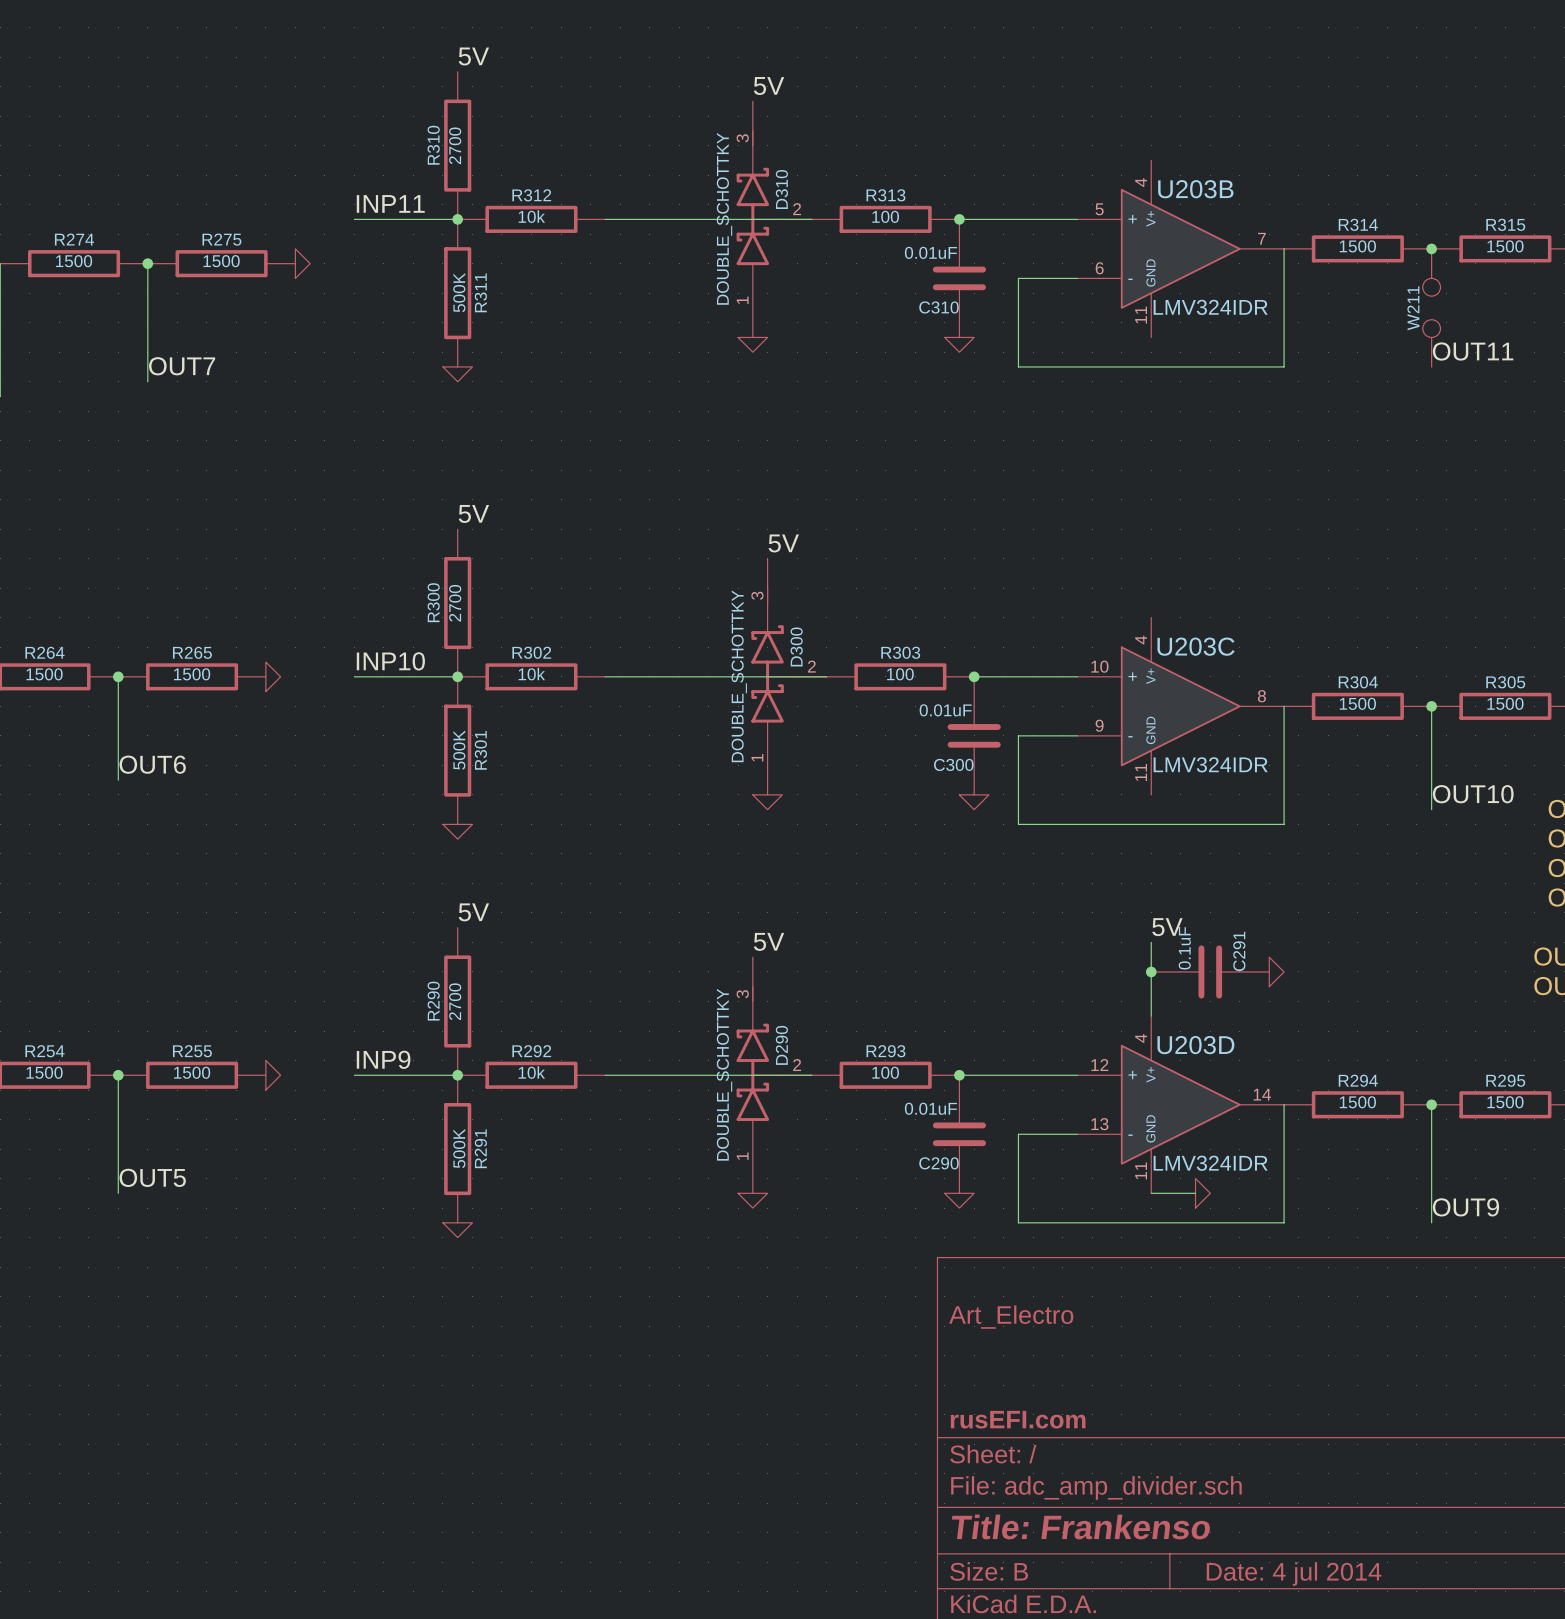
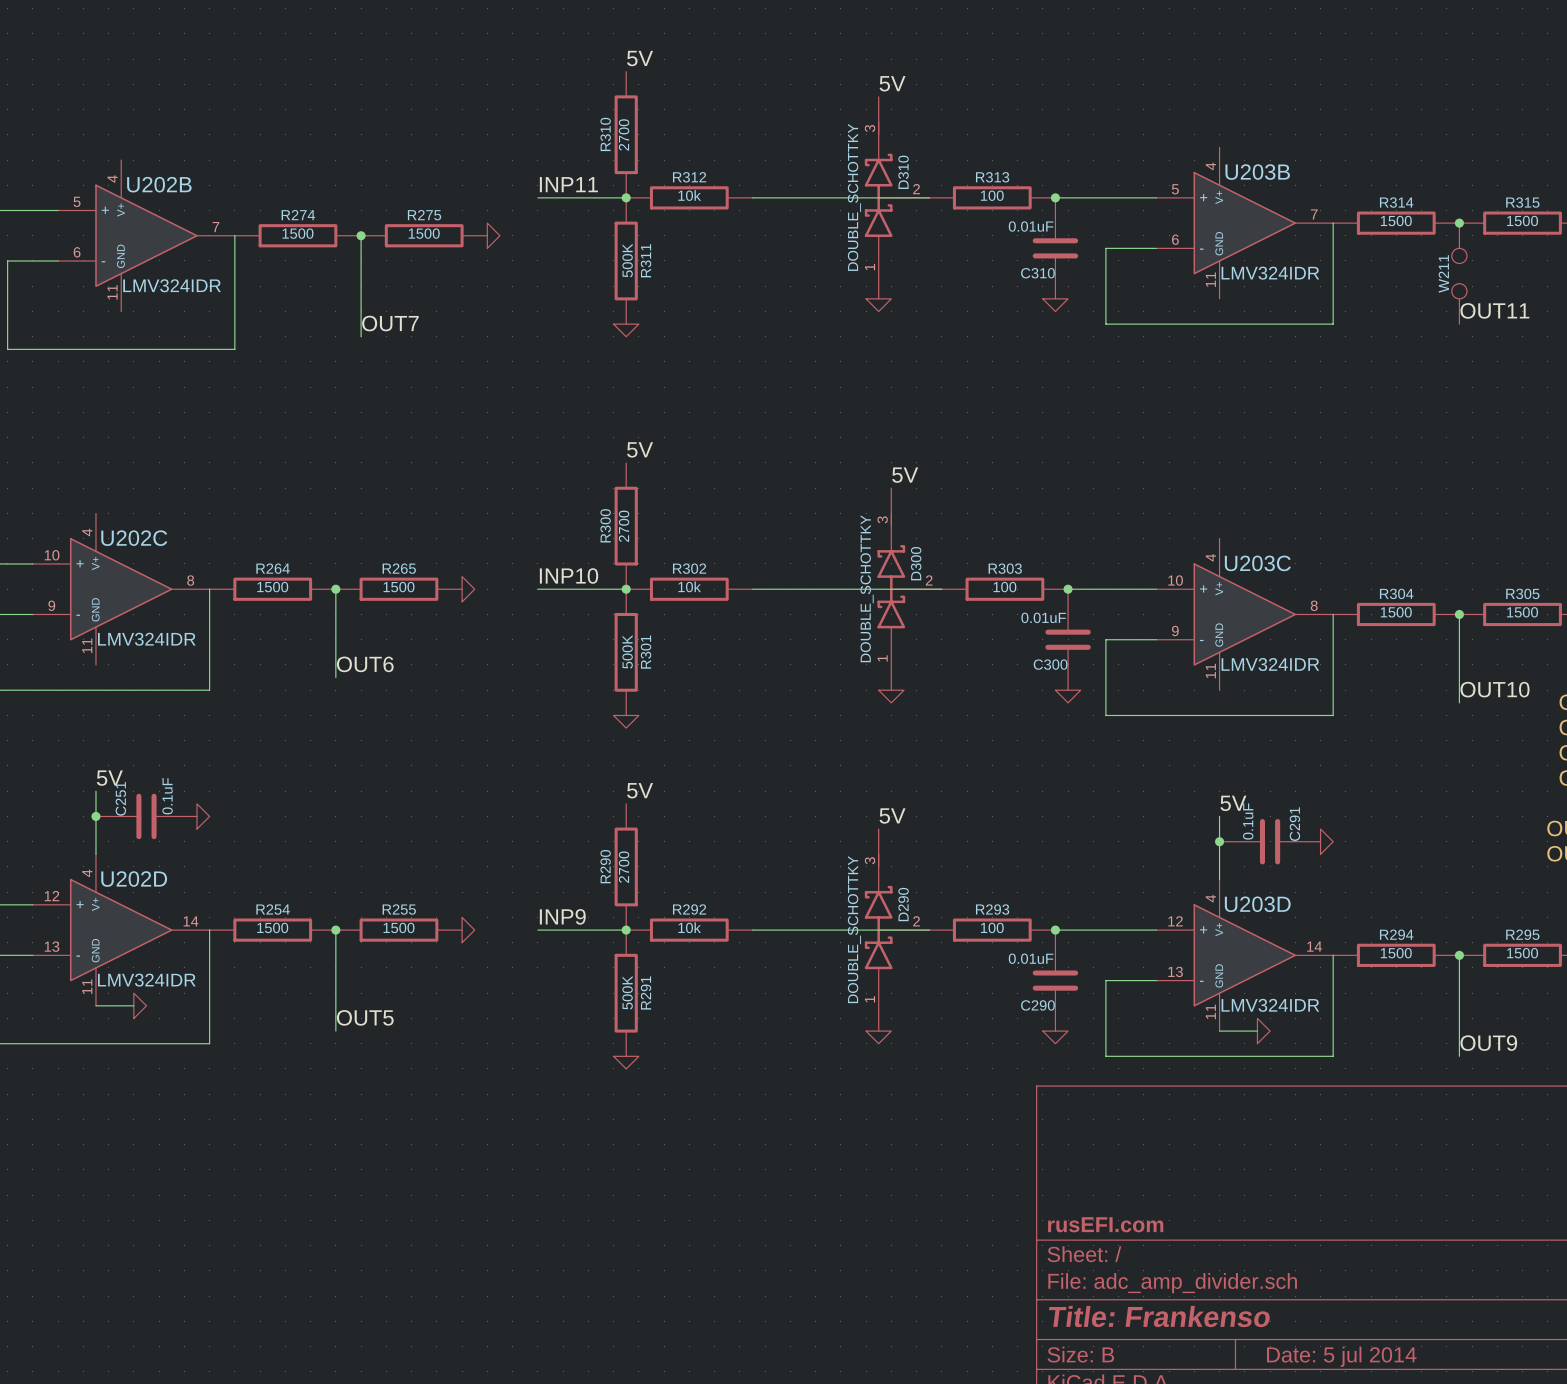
title block: Art_Electro (1011, 1317) -> none
title block: Date: 4 jul 2014 (1294, 1573) -> Date: 5 jul 2014 (1341, 1356)

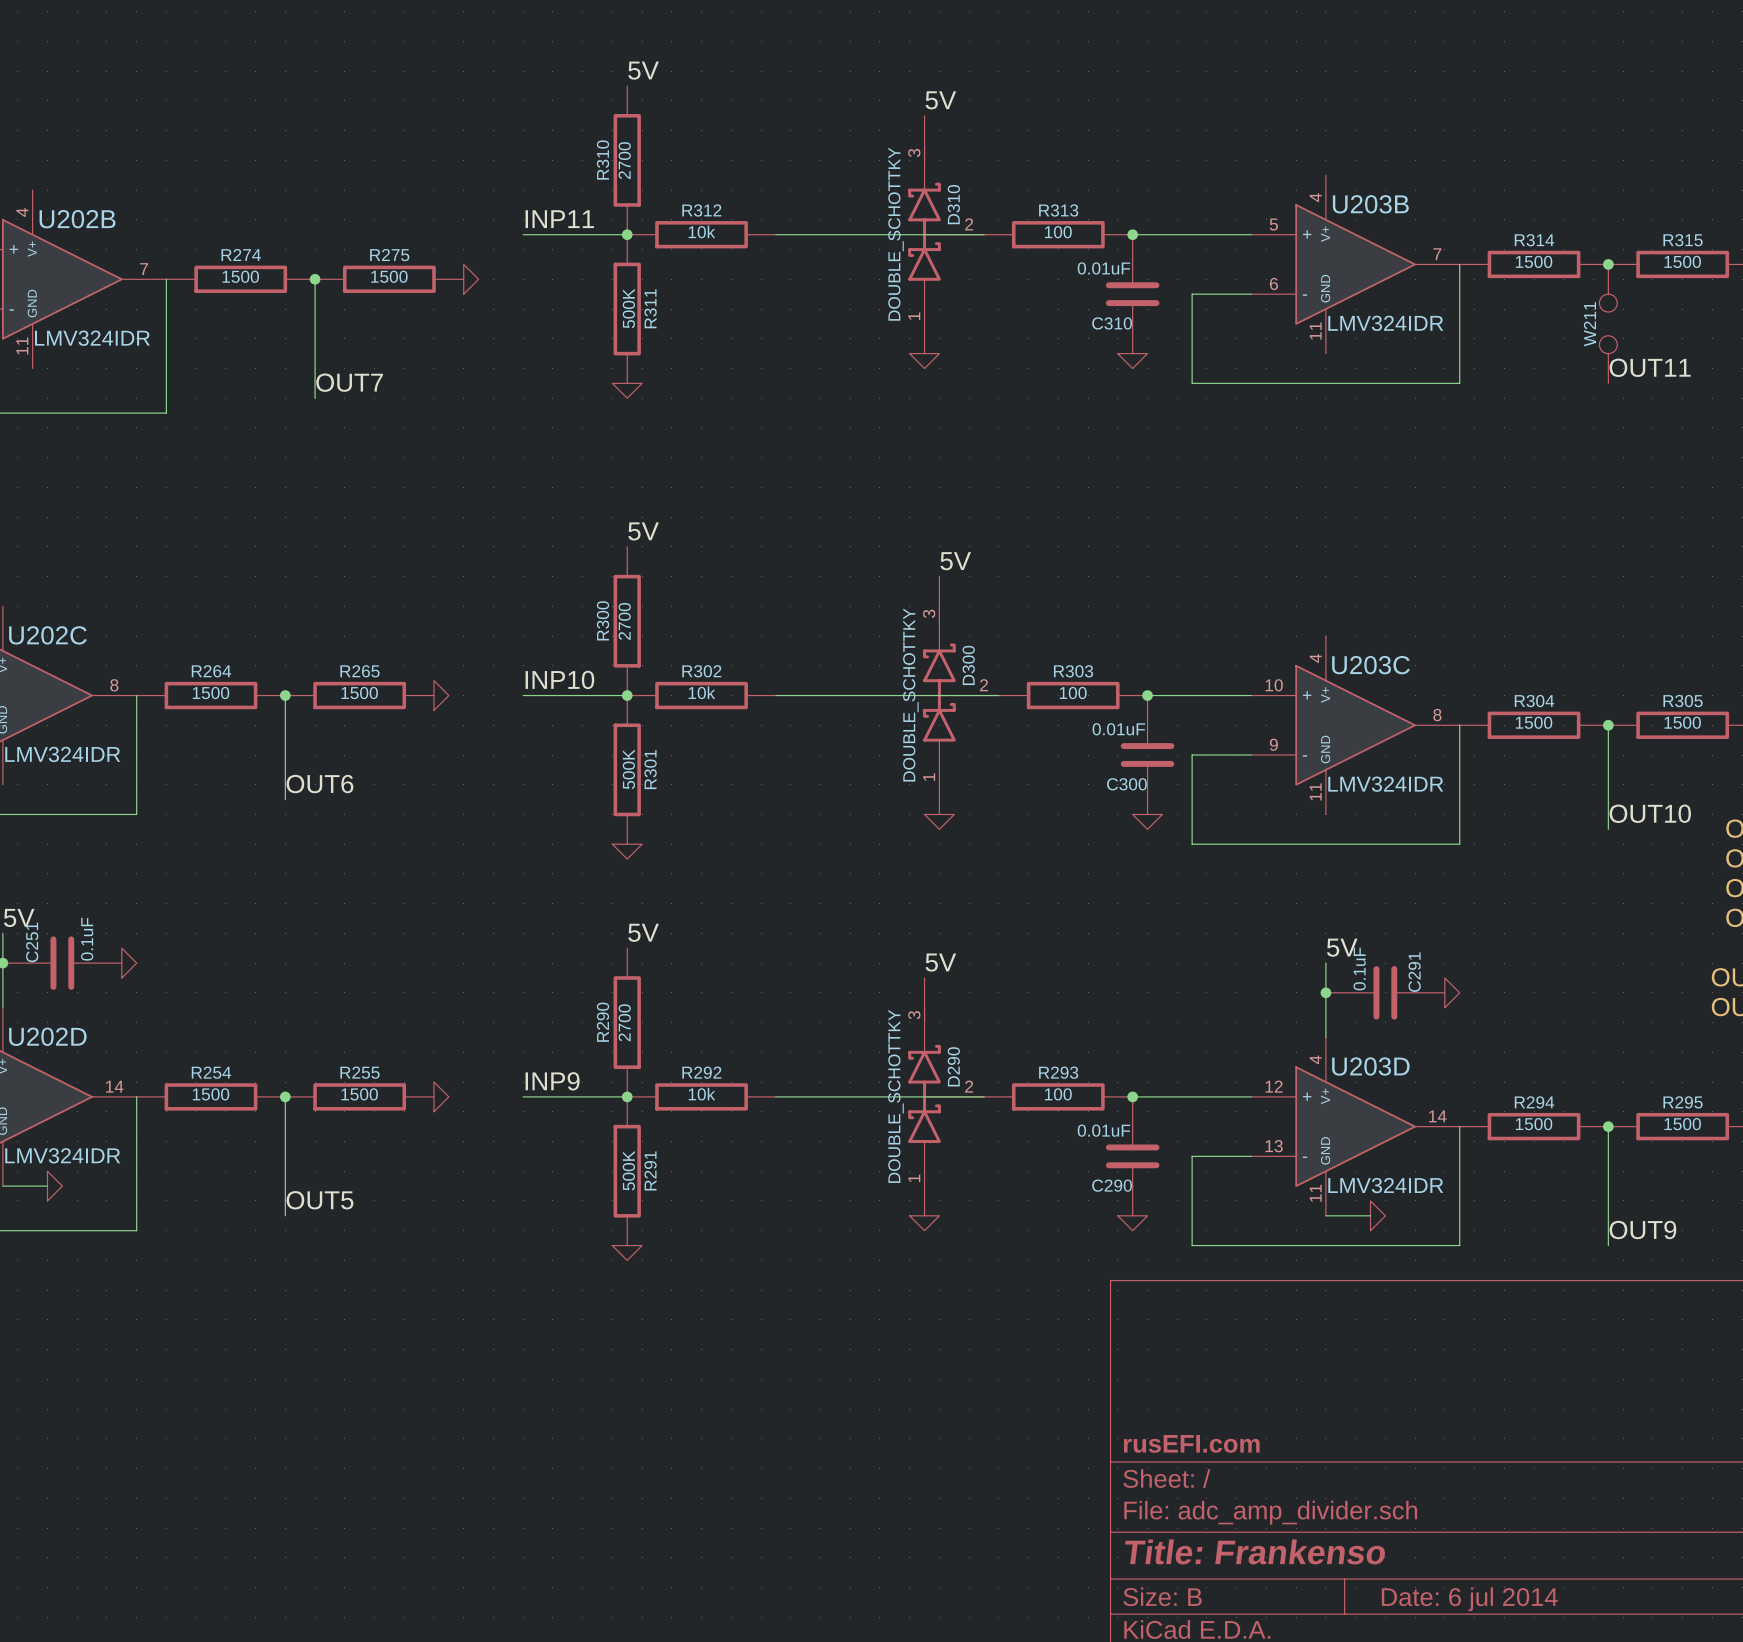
title block: Date: 5 jul 2014 (1341, 1356) -> Date: 6 jul 2014 (1469, 1599)

